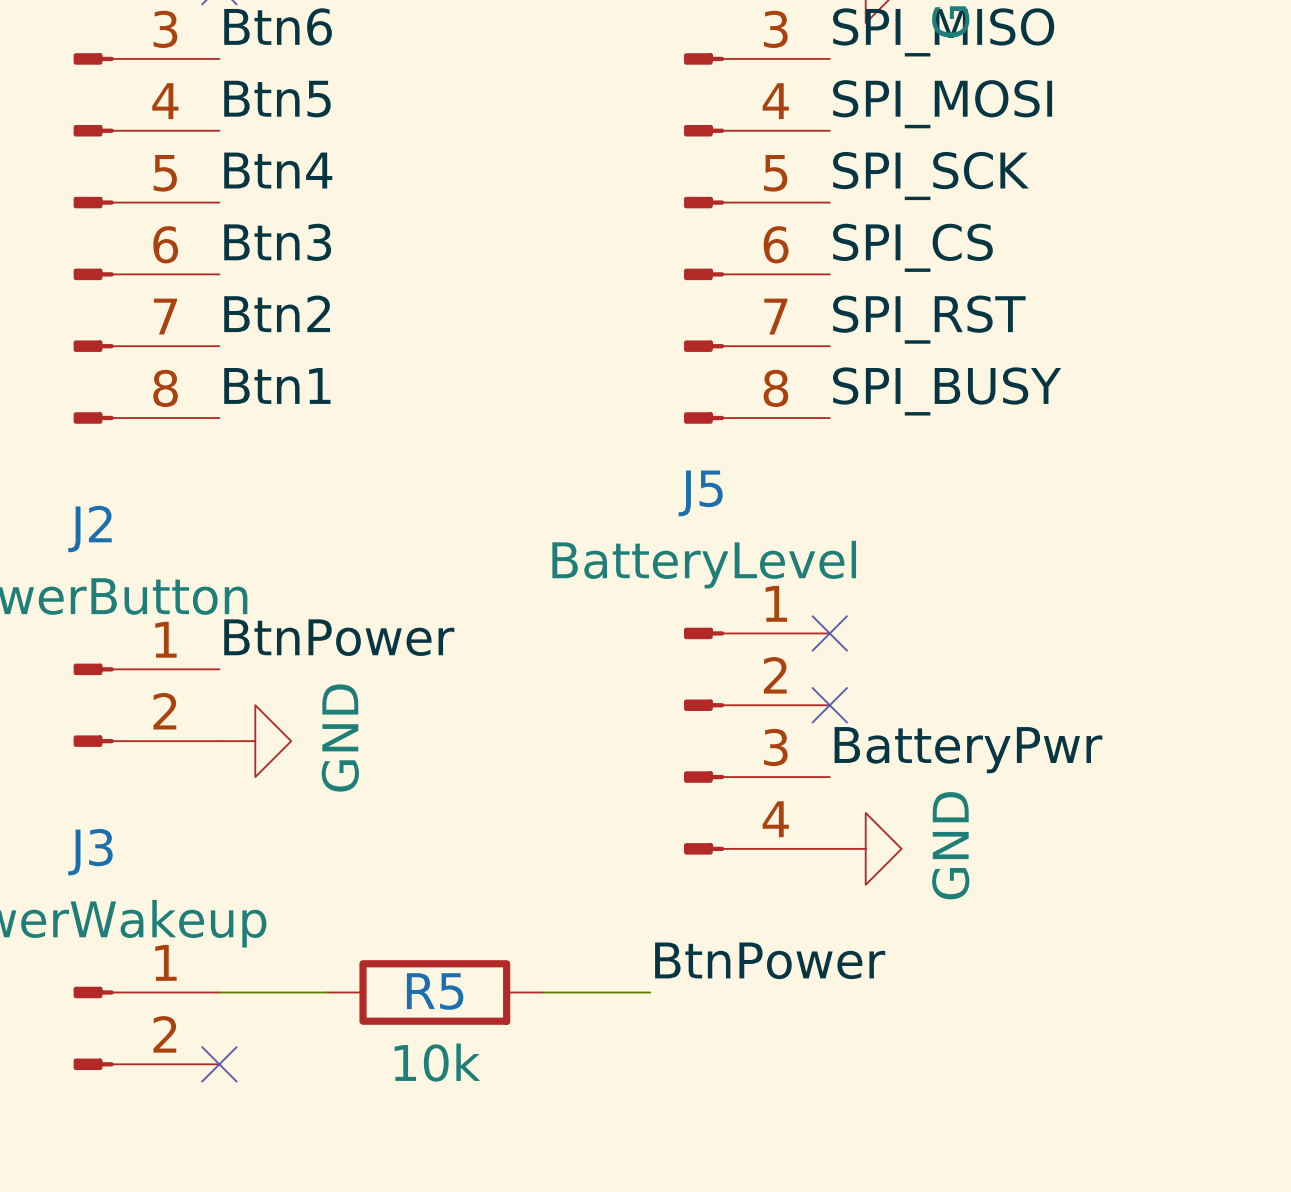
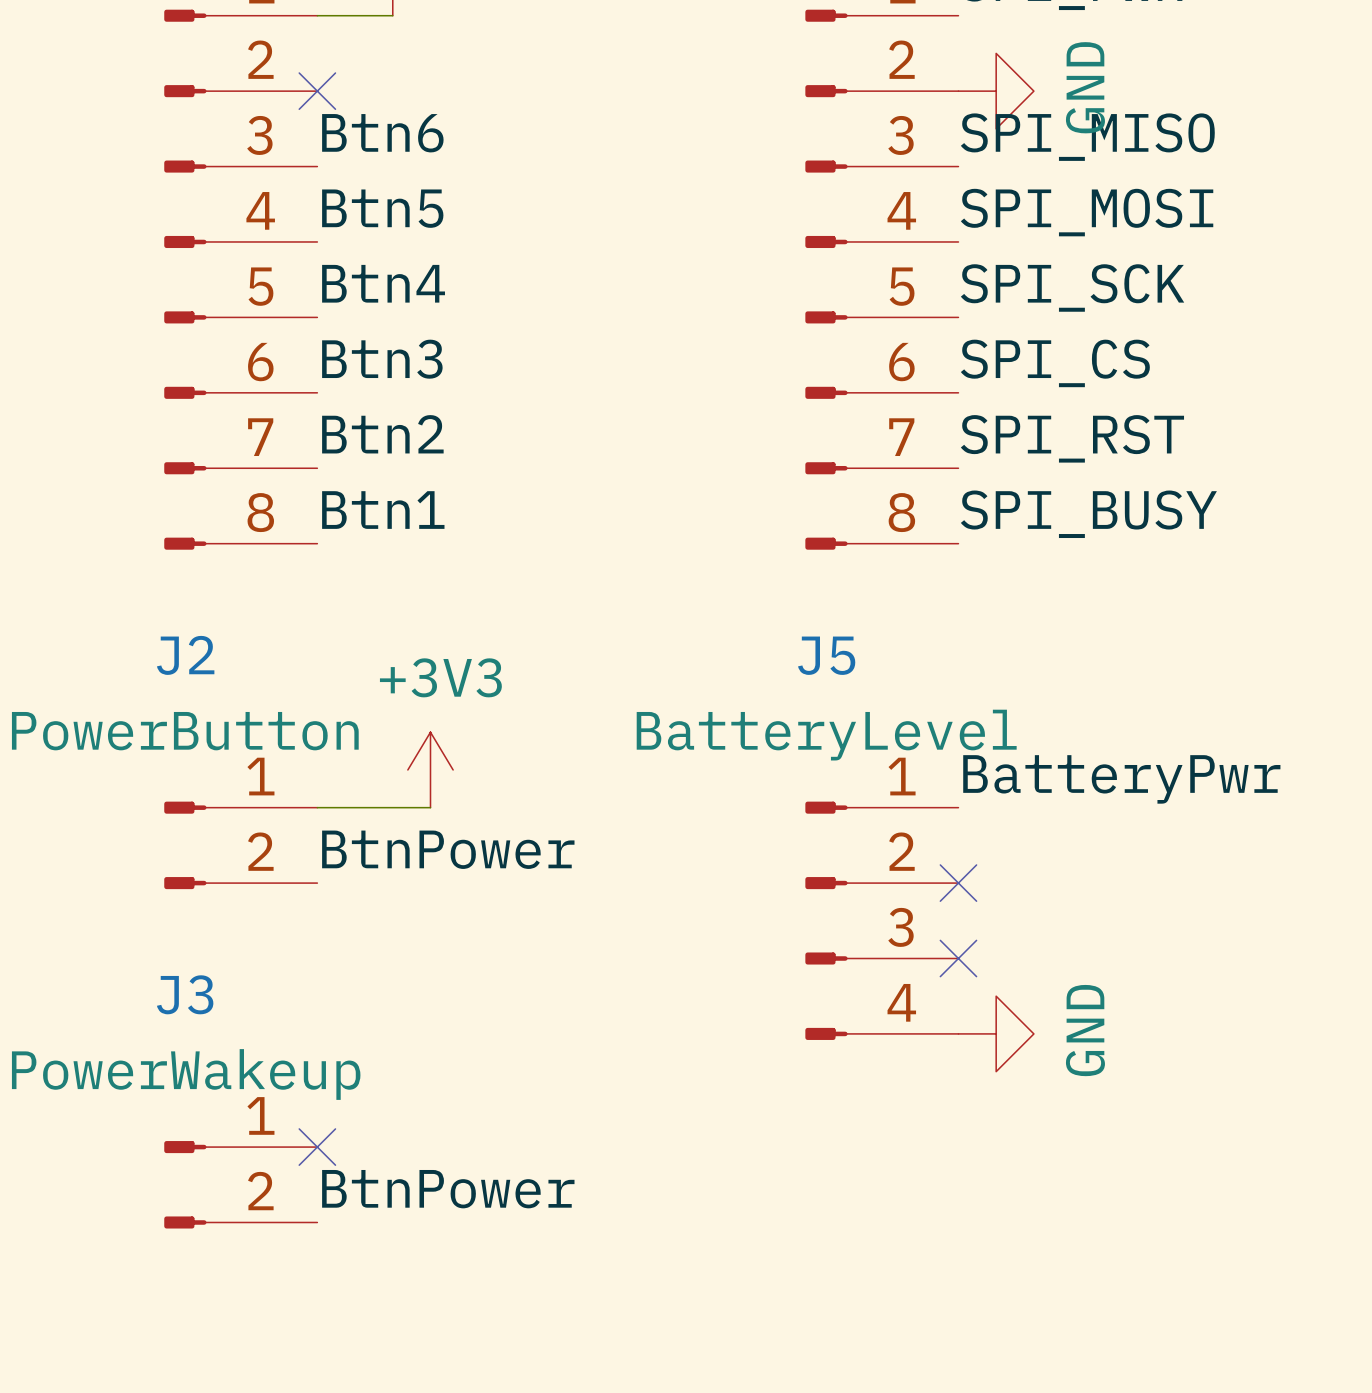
power symbol: none -> +3V3 (430, 769)
no-connect mark: (829, 633) -> none
label position: BtnPower (339, 637) -> BtnPower (448, 849)
no-connect mark position: (829, 705) -> (958, 883)
power symbol: GND (255, 741) -> none
J5 position: (756, 741) -> (881, 920)
label position: BatteryPwr (968, 750) -> BatteryPwr (1121, 779)
no-connect mark: none -> (958, 958)
power symbol position: GND (865, 848) -> GND (996, 1033)
label: BtnPower (770, 960) -> none
wire: (219, 992) (327, 992) -> (317, 807) (430, 807)
R5: 10k (434, 992) -> none
wire: (542, 992) (650, 992) -> none
label: none -> BtnPower (448, 1189)
no-connect mark position: (219, 1064) -> (317, 1147)

